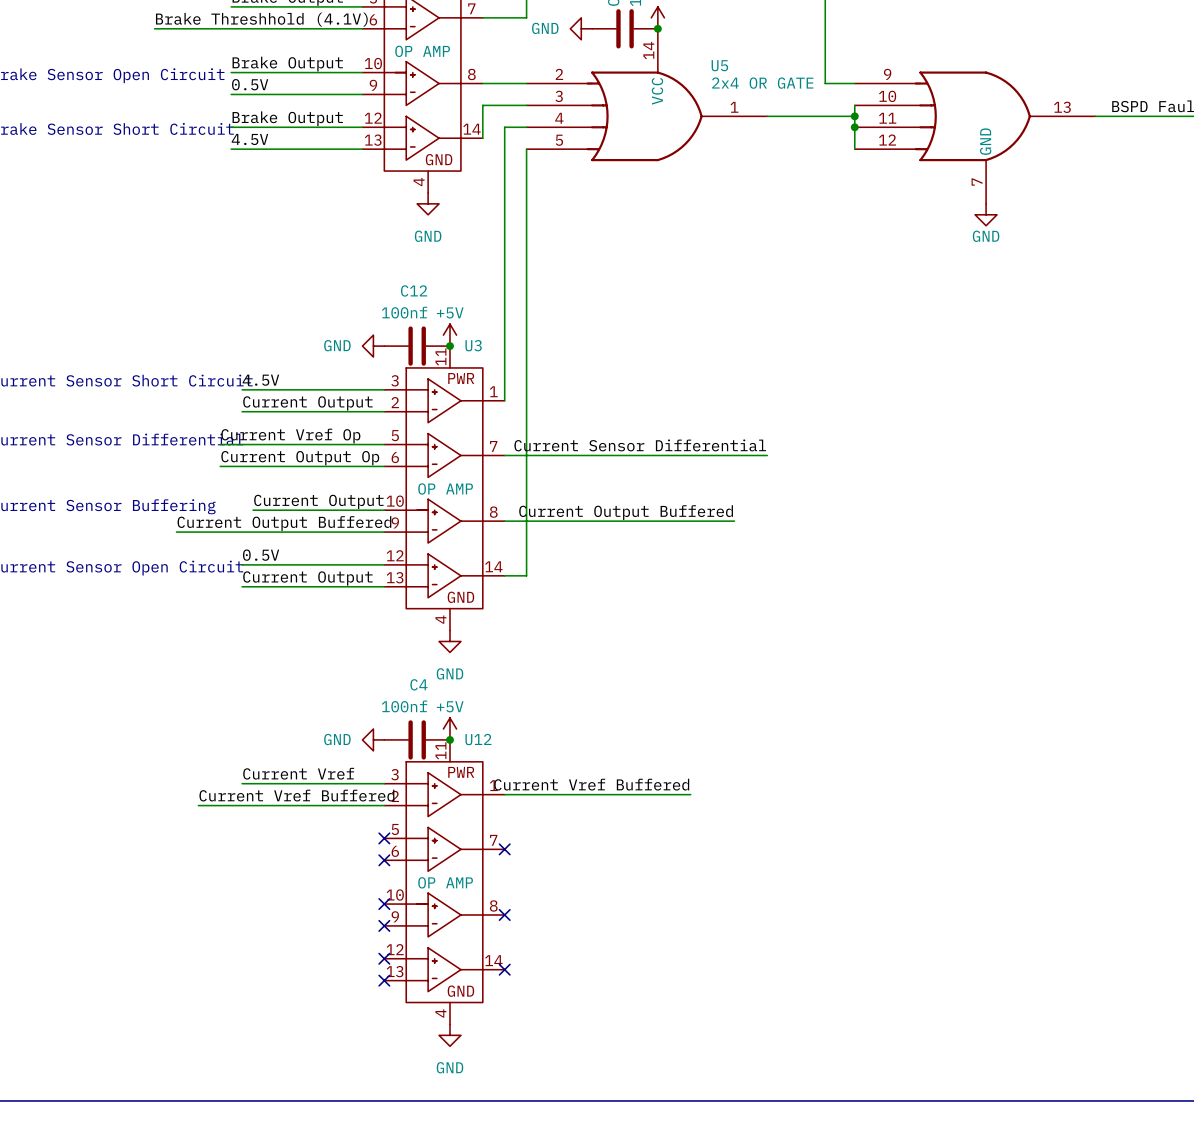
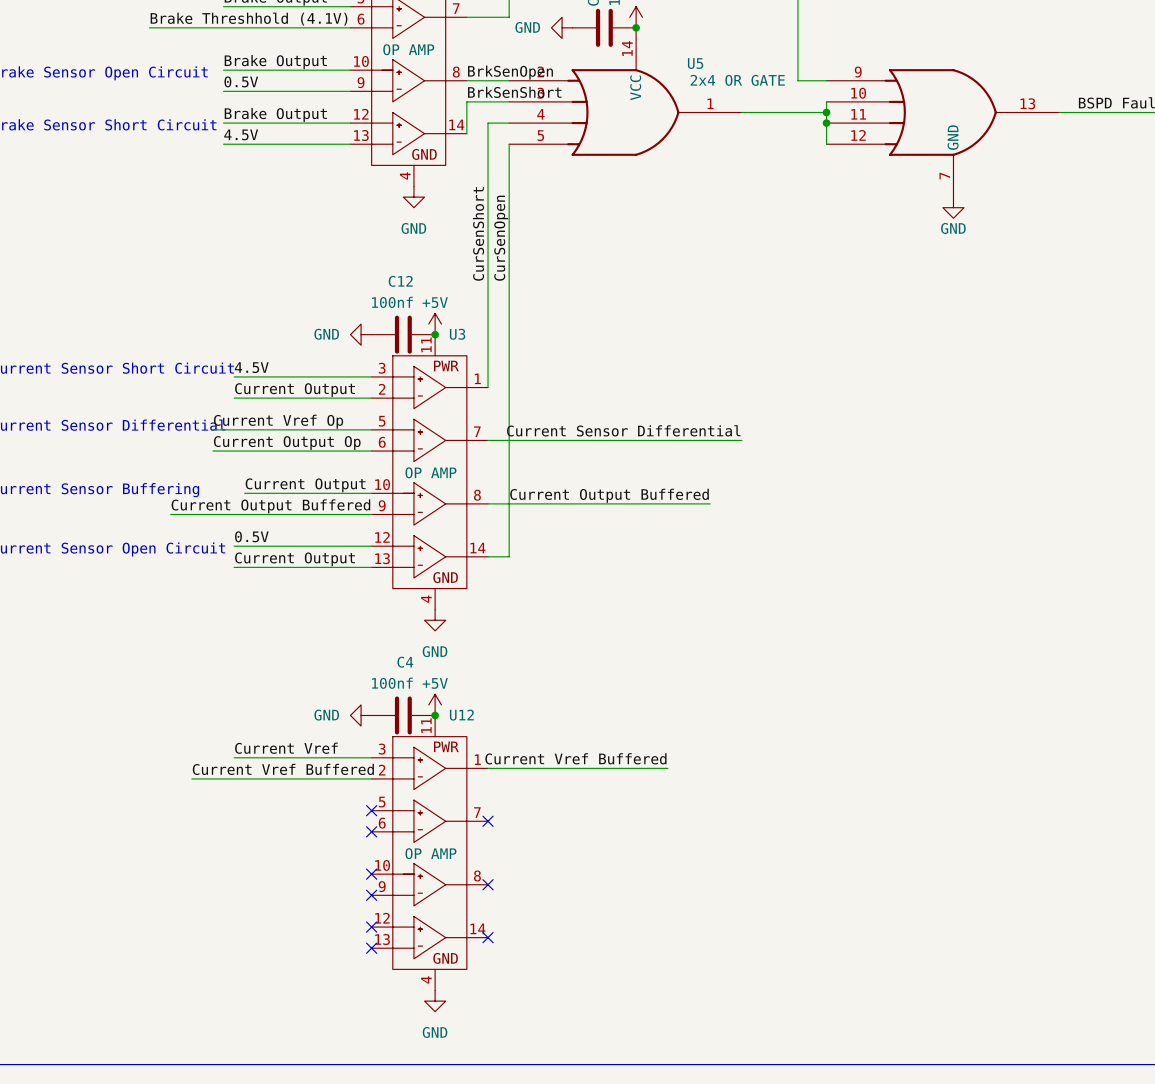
label: none -> BrkSenOpen (510, 72)
label: none -> BrkSenShort (514, 92)
label: none -> CurSenShort (478, 233)
label: none -> CurSenOpen (501, 238)

